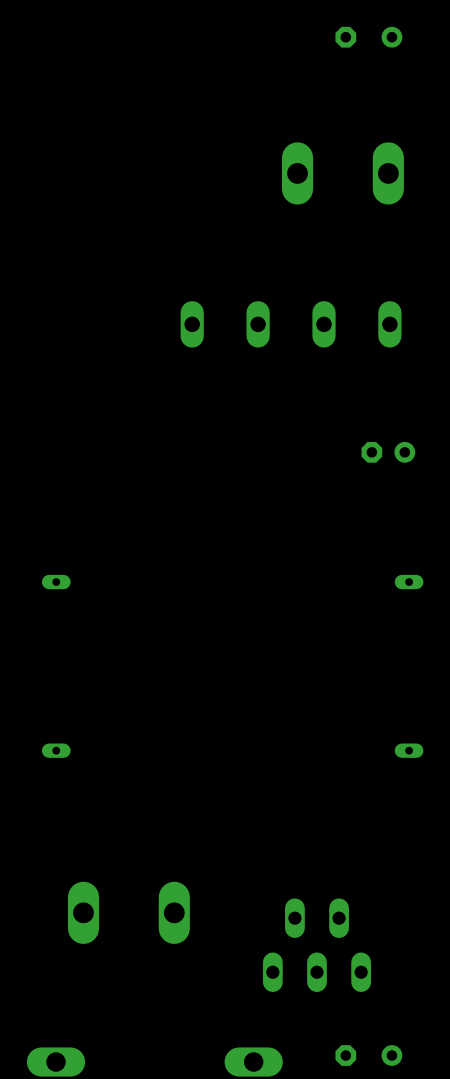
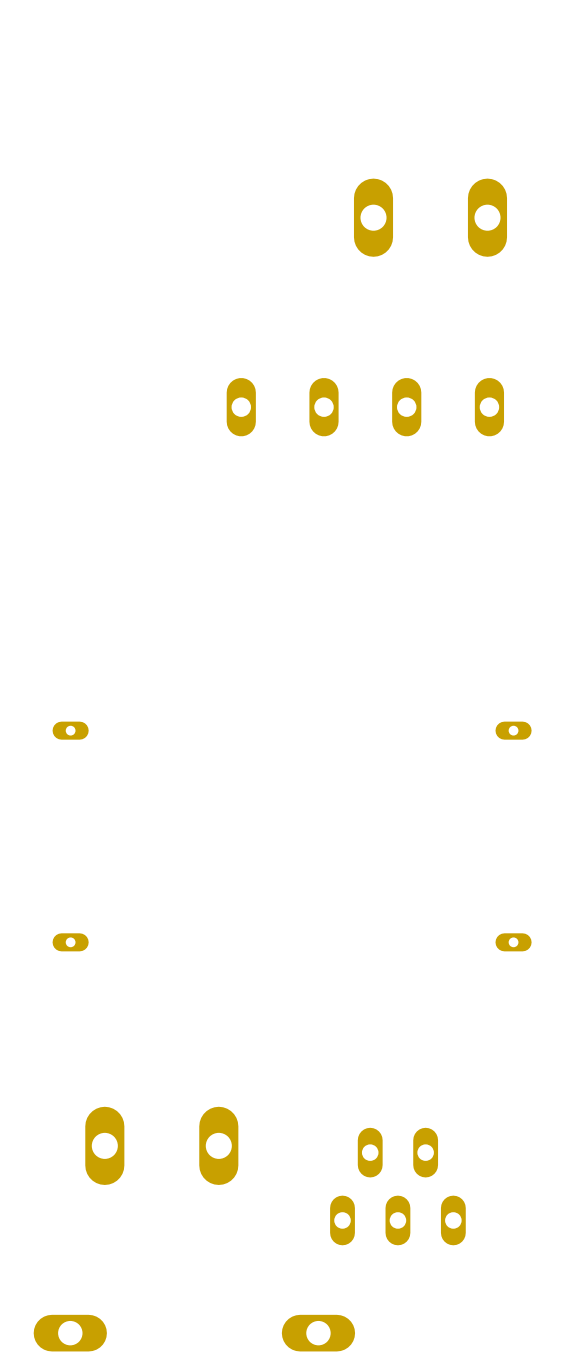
part: (368, 37) -> none
part: (388, 452) -> none
part: (368, 1055) -> none

